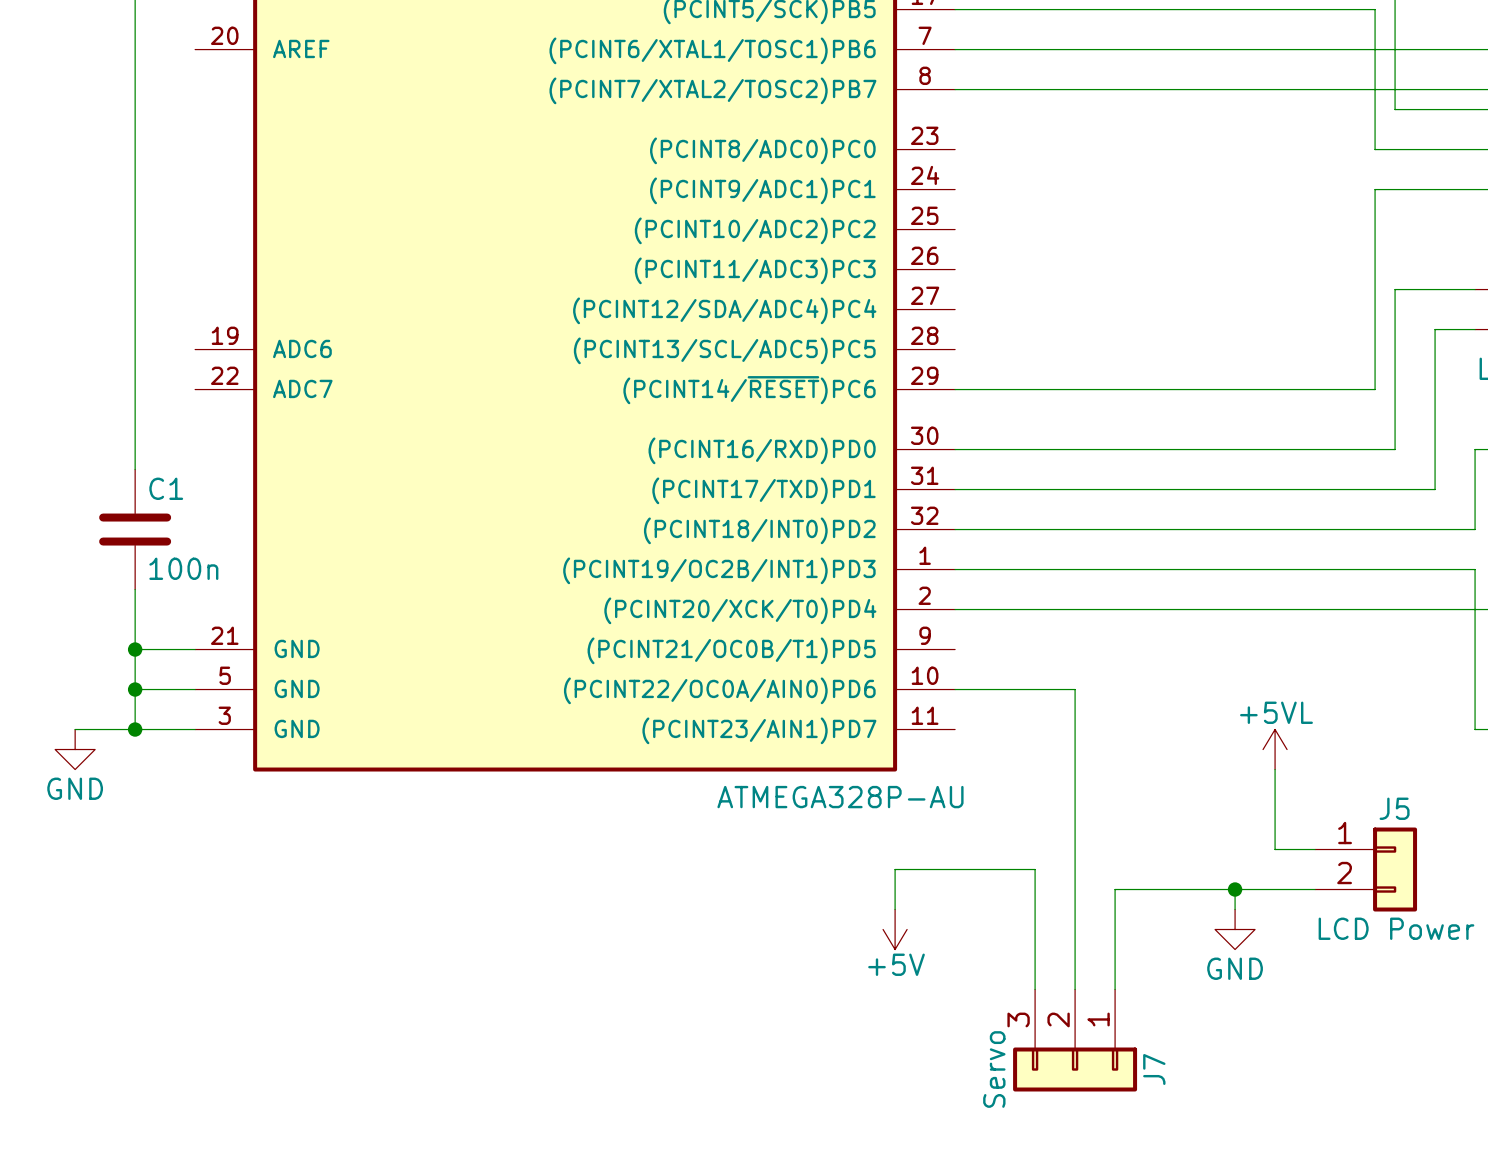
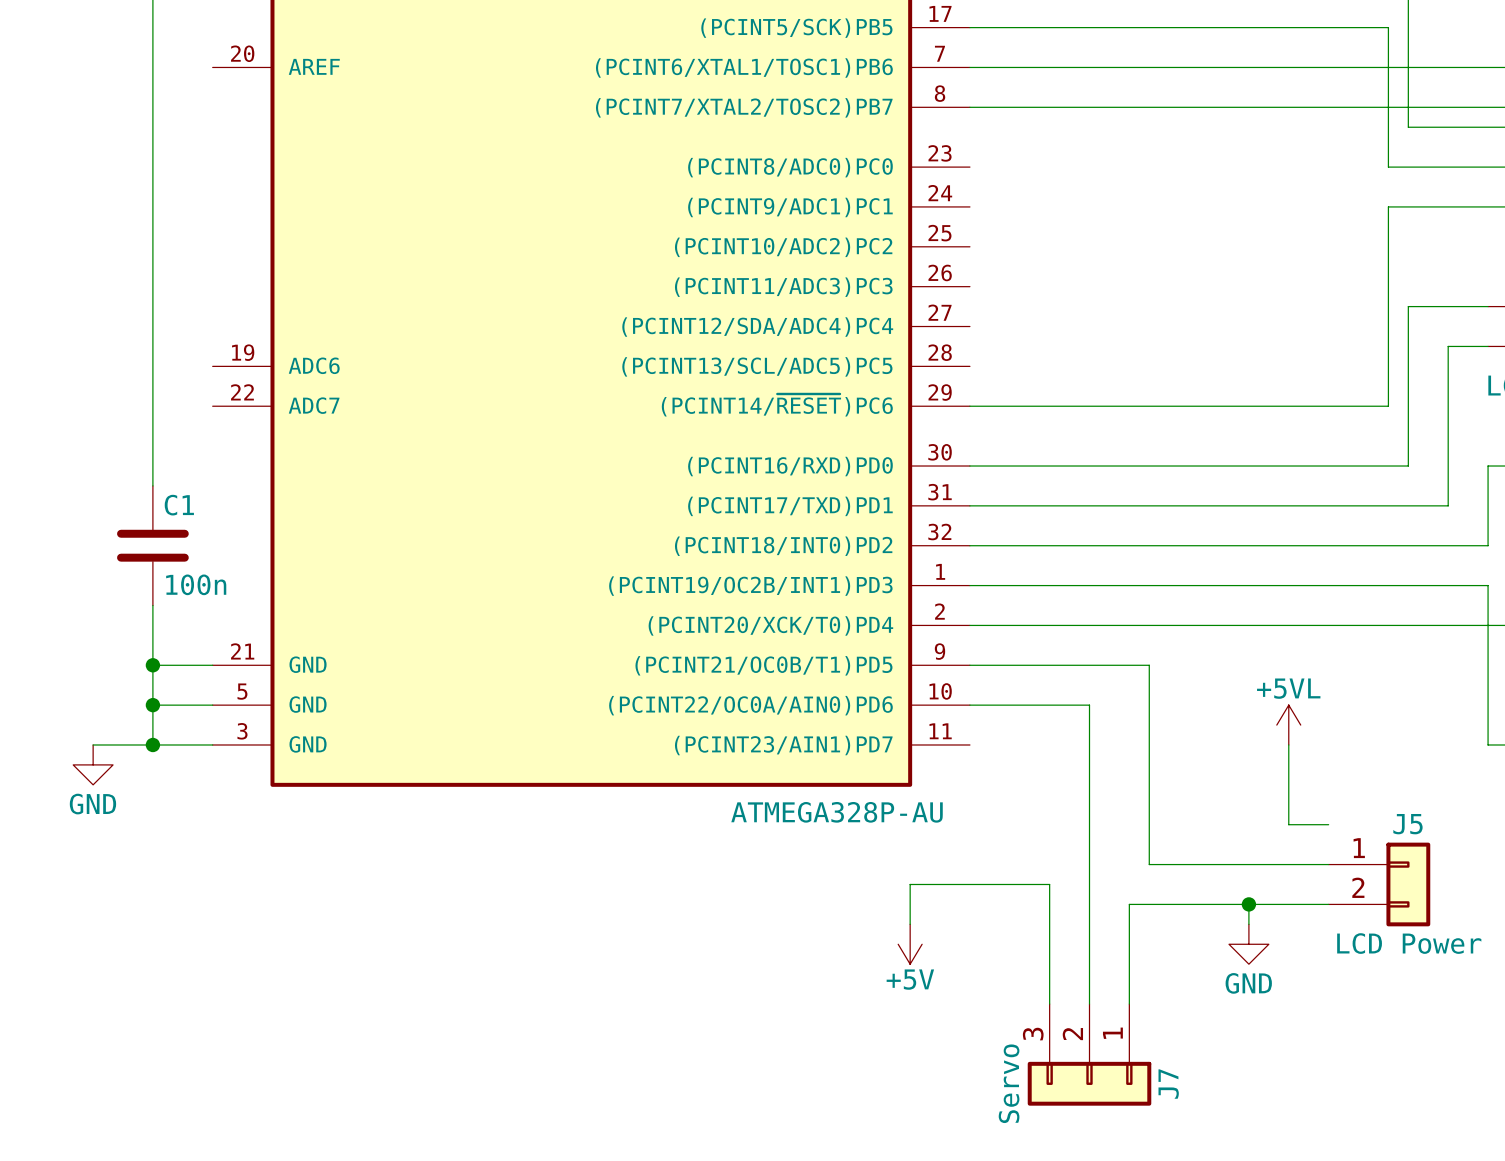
wire: none -> (969, 665) (1149, 665) (1149, 864) (1288, 864)
power symbol position: +5VL (1275, 749) -> +5VL (1288, 725)
wire: (1275, 809) (1275, 849) -> (1288, 824) (1328, 824)

